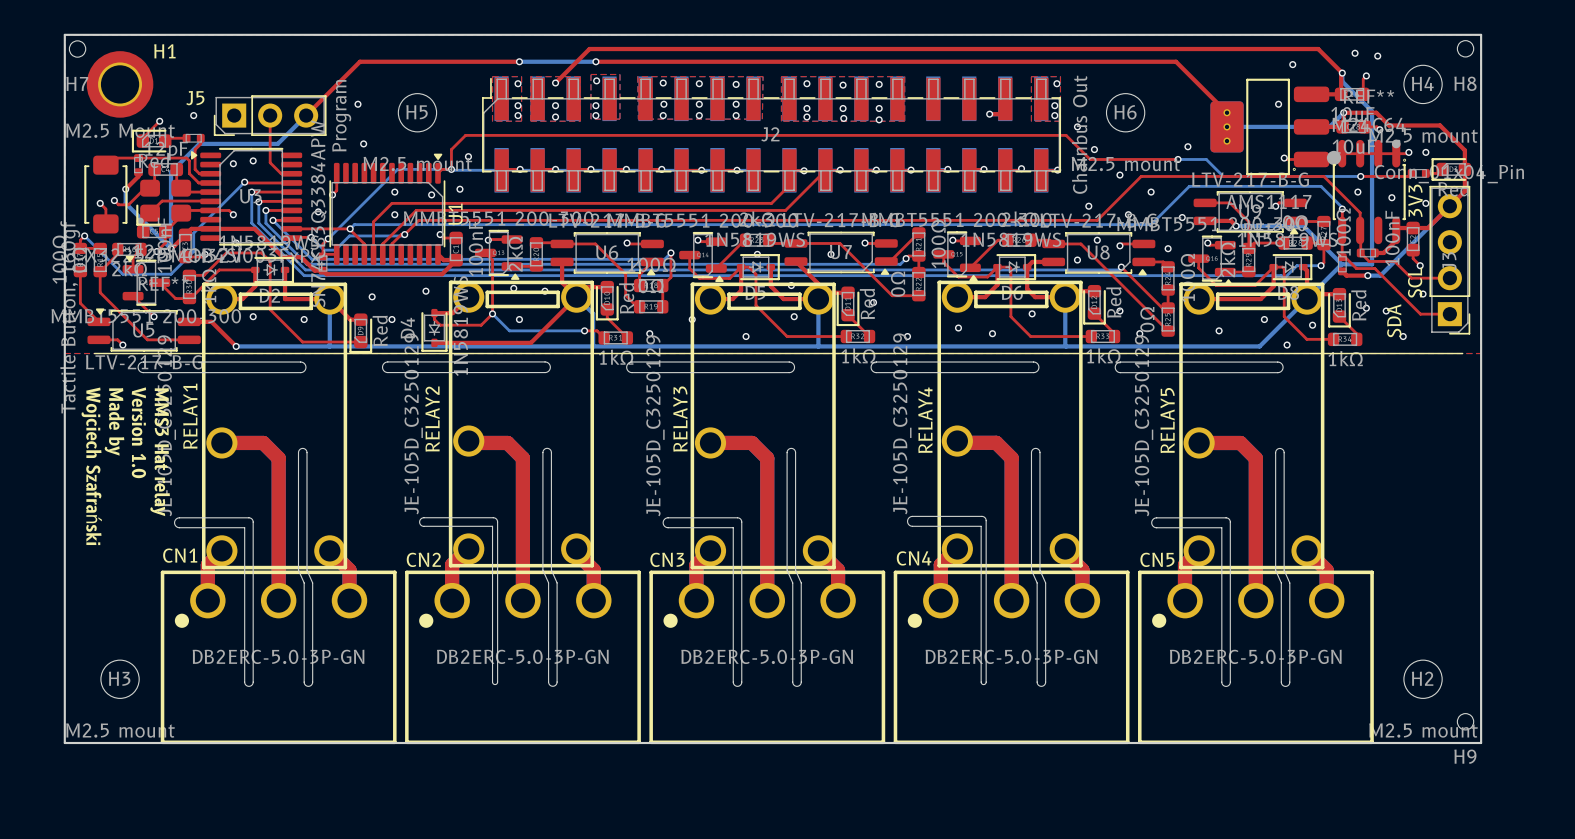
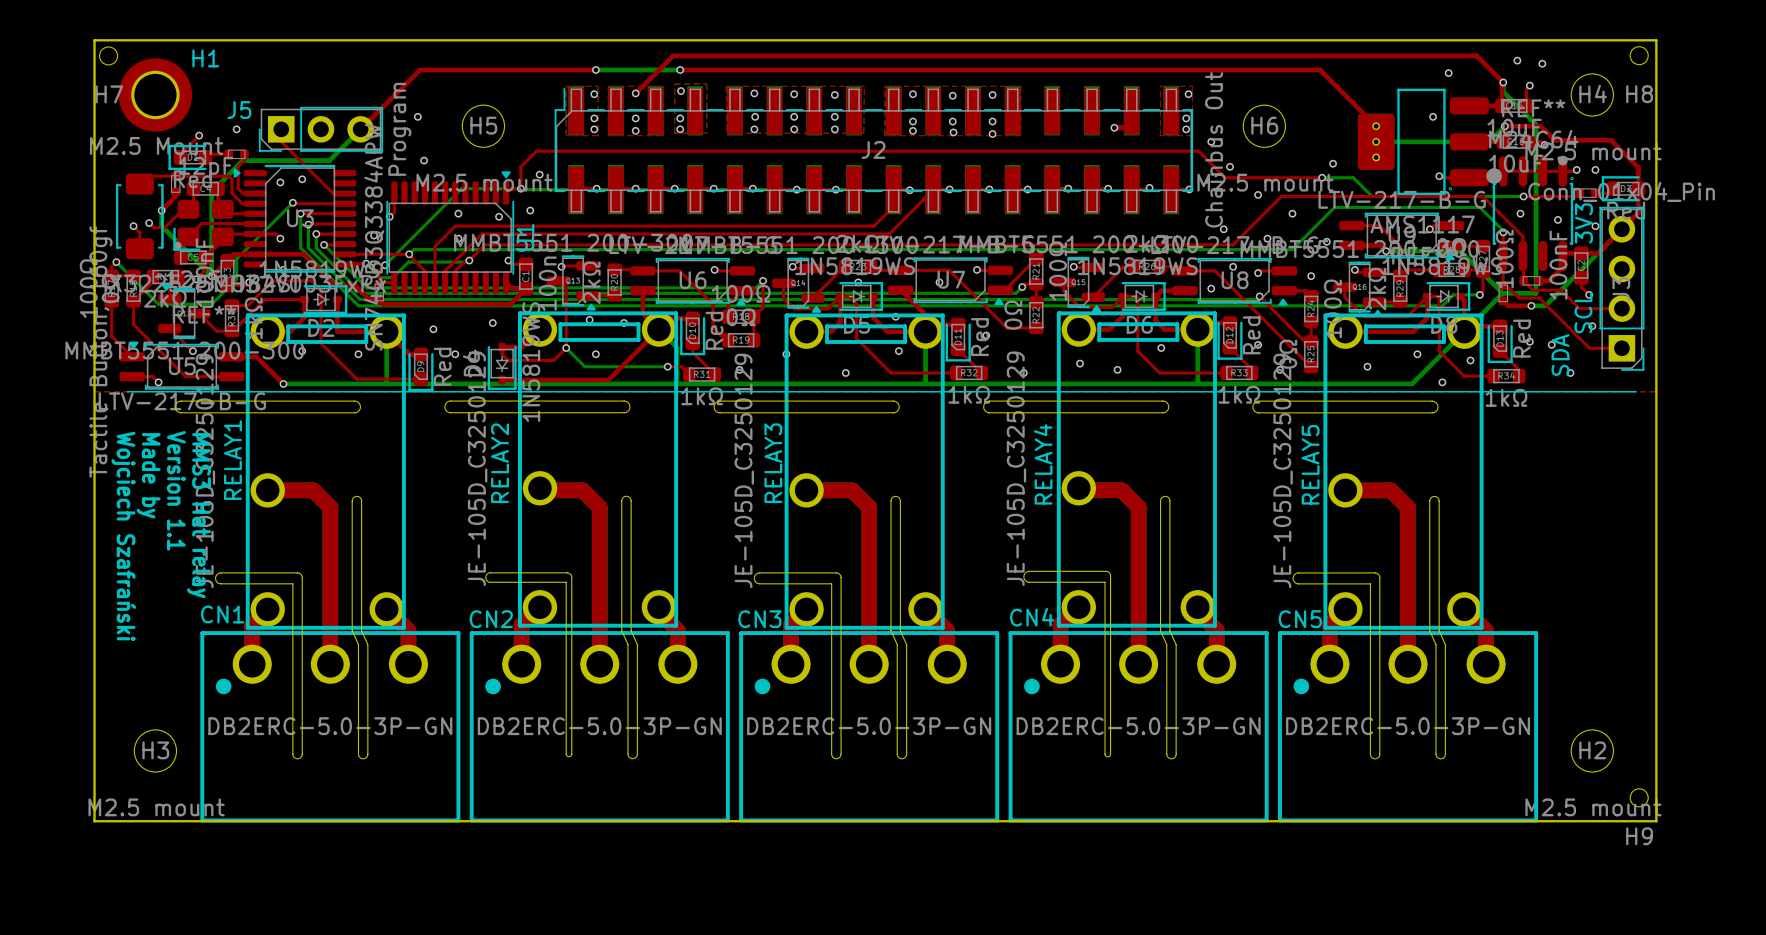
top track: (270, 115) (270, 162) -> (281, 129) (281, 141) (320, 181)
text: Version 1.0 (138, 432) -> Version 1.1 (176, 490)

